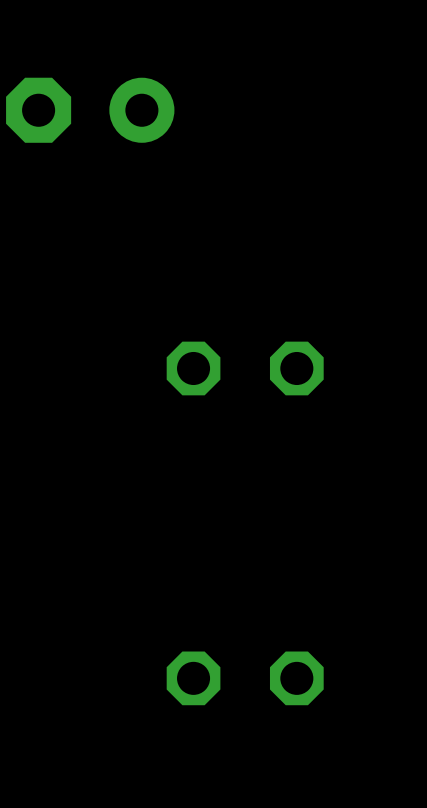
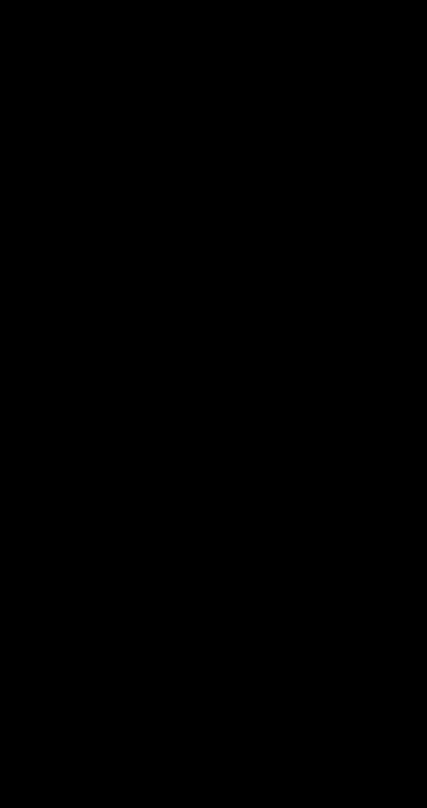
part: (90, 110) -> none
part: (245, 368) -> none
part: (245, 678) -> none

